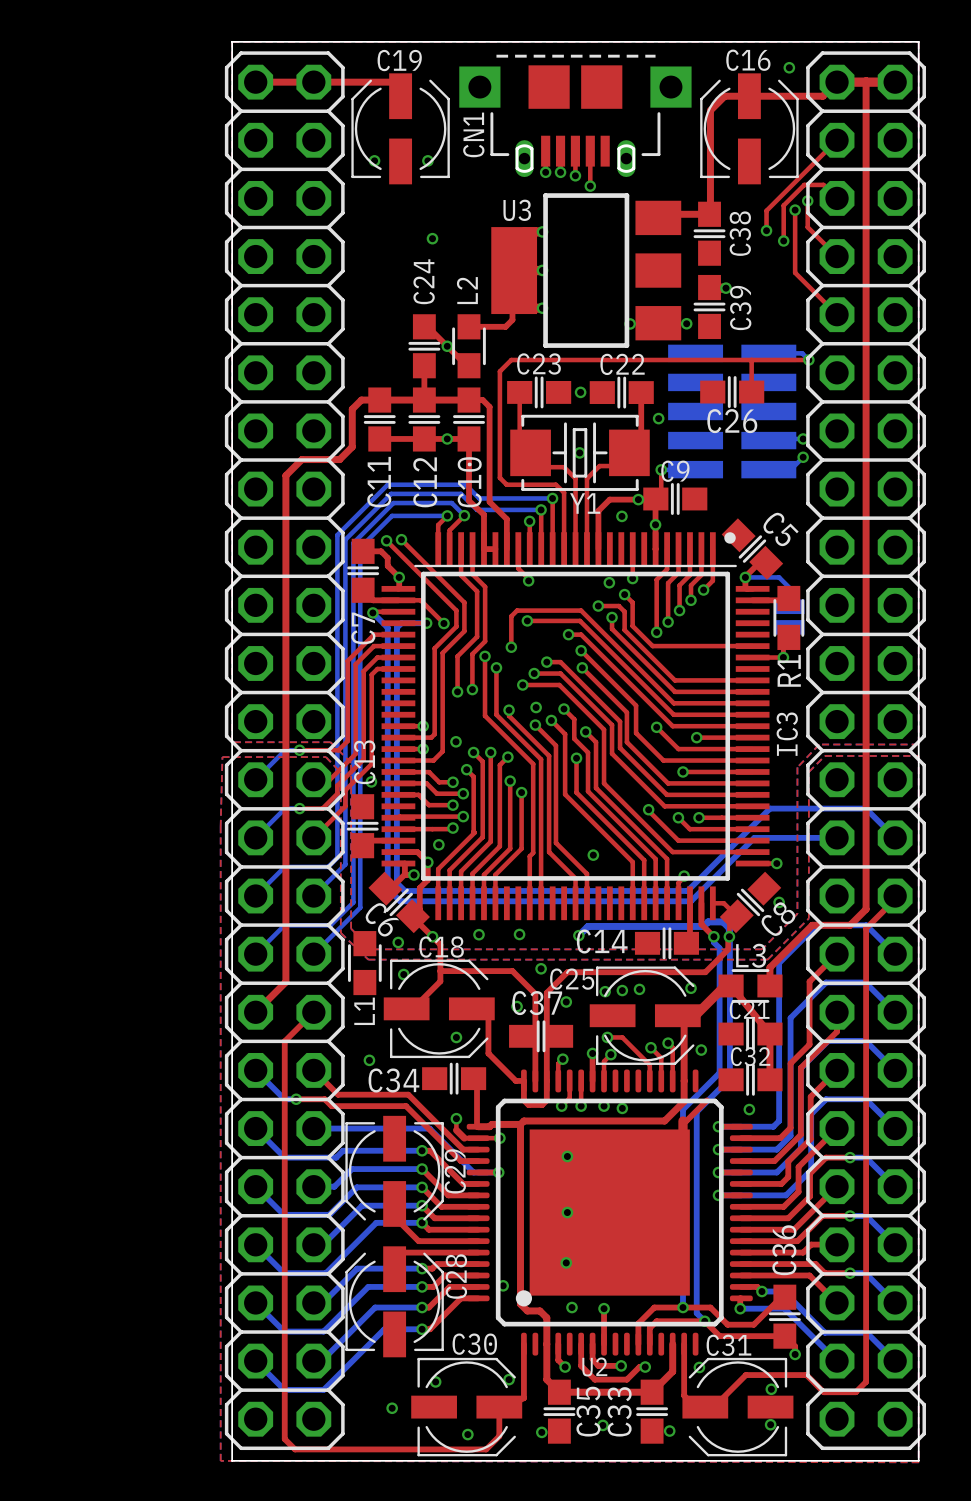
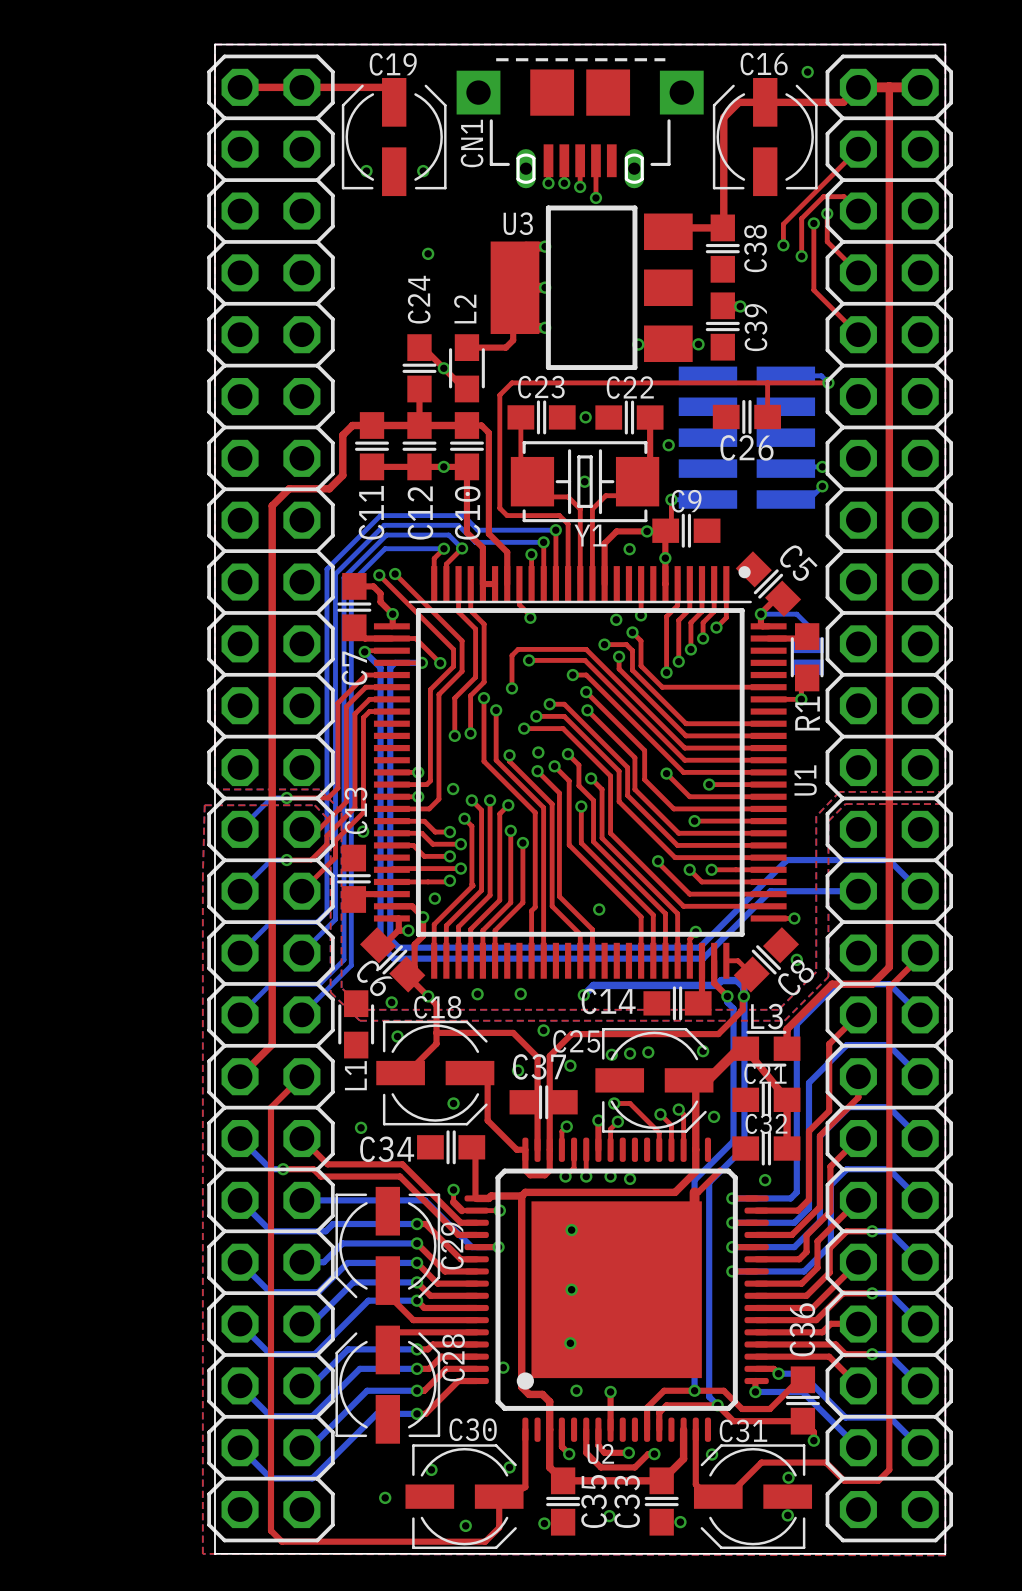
IC3 name: IC3 (787, 734) -> U1 (805, 780)

